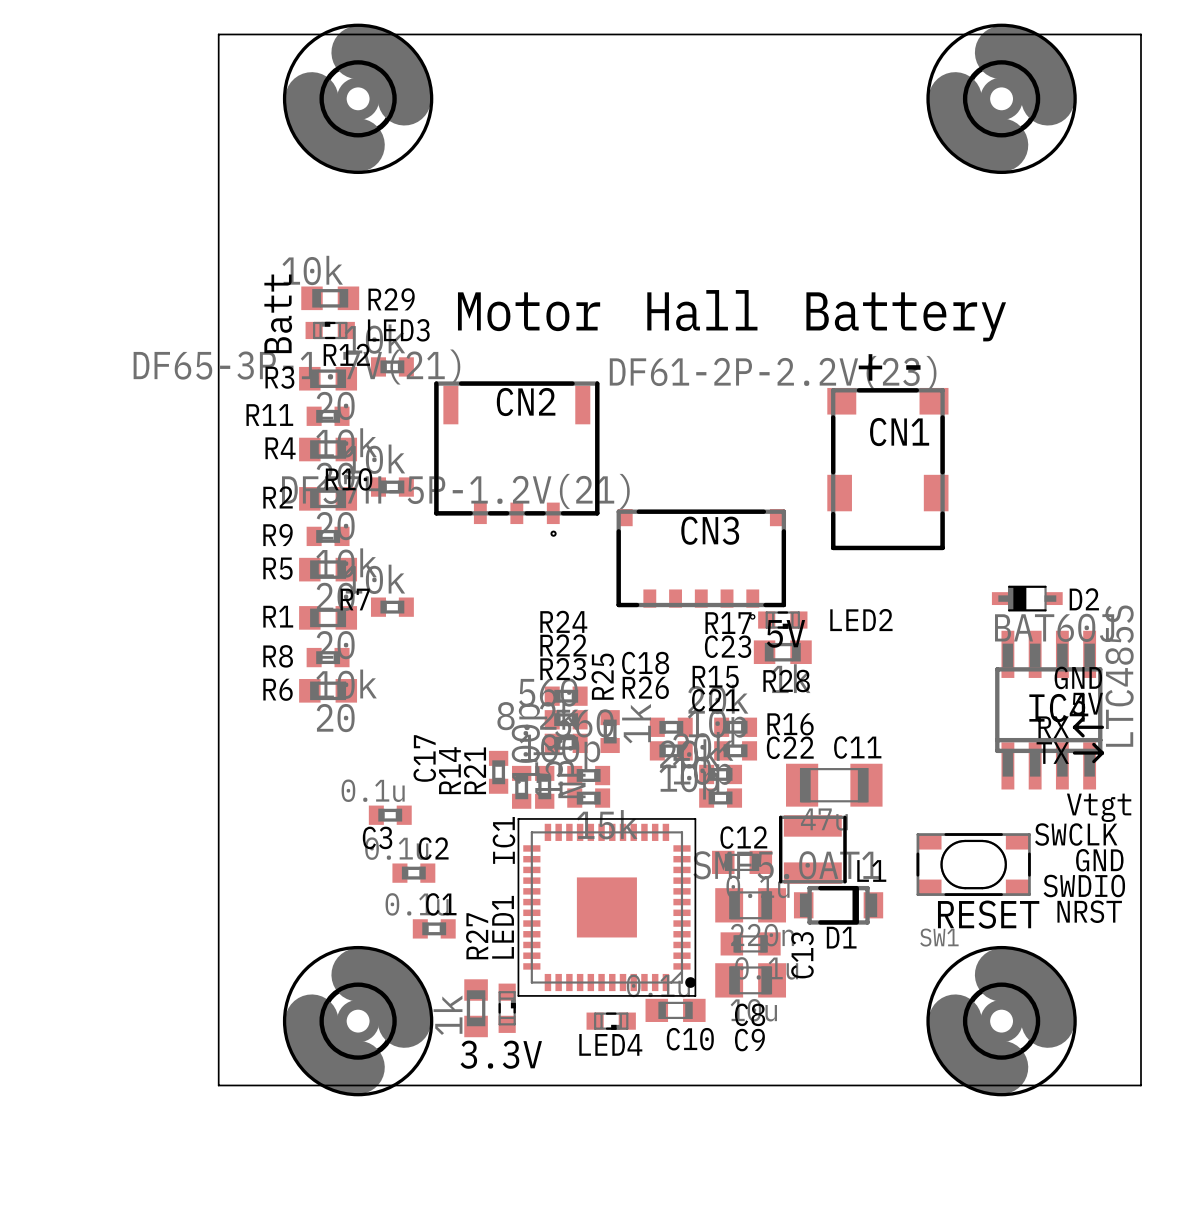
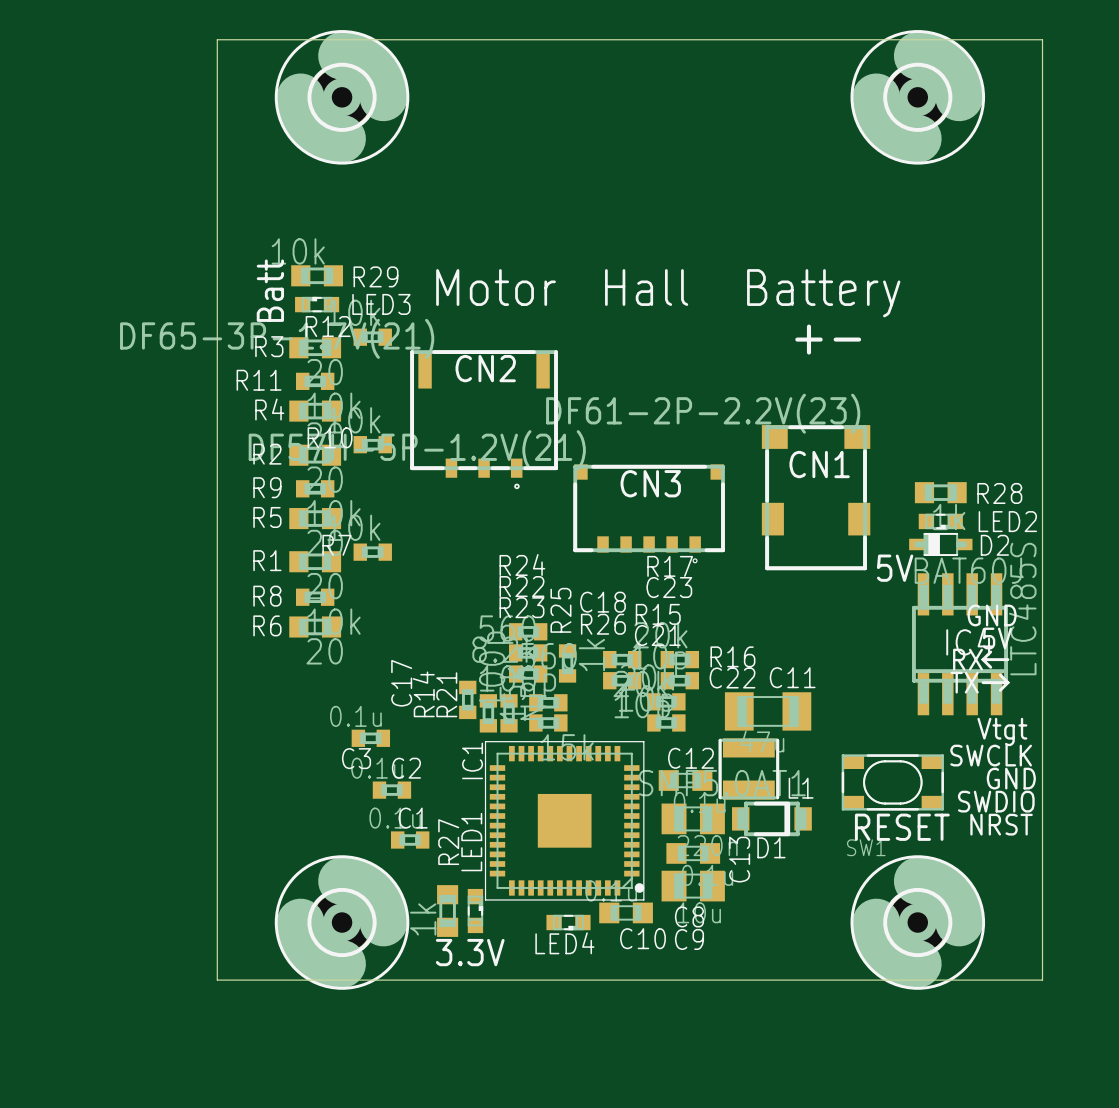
CN1 position: (887, 469) -> (816, 497)
LED2 position: (782, 620) -> (940, 521)
text position: 5V (785, 633) -> 5V (895, 568)
R28 position: (782, 652) -> (940, 492)
R28 name position: R28 (786, 681) -> R28 (999, 493)

